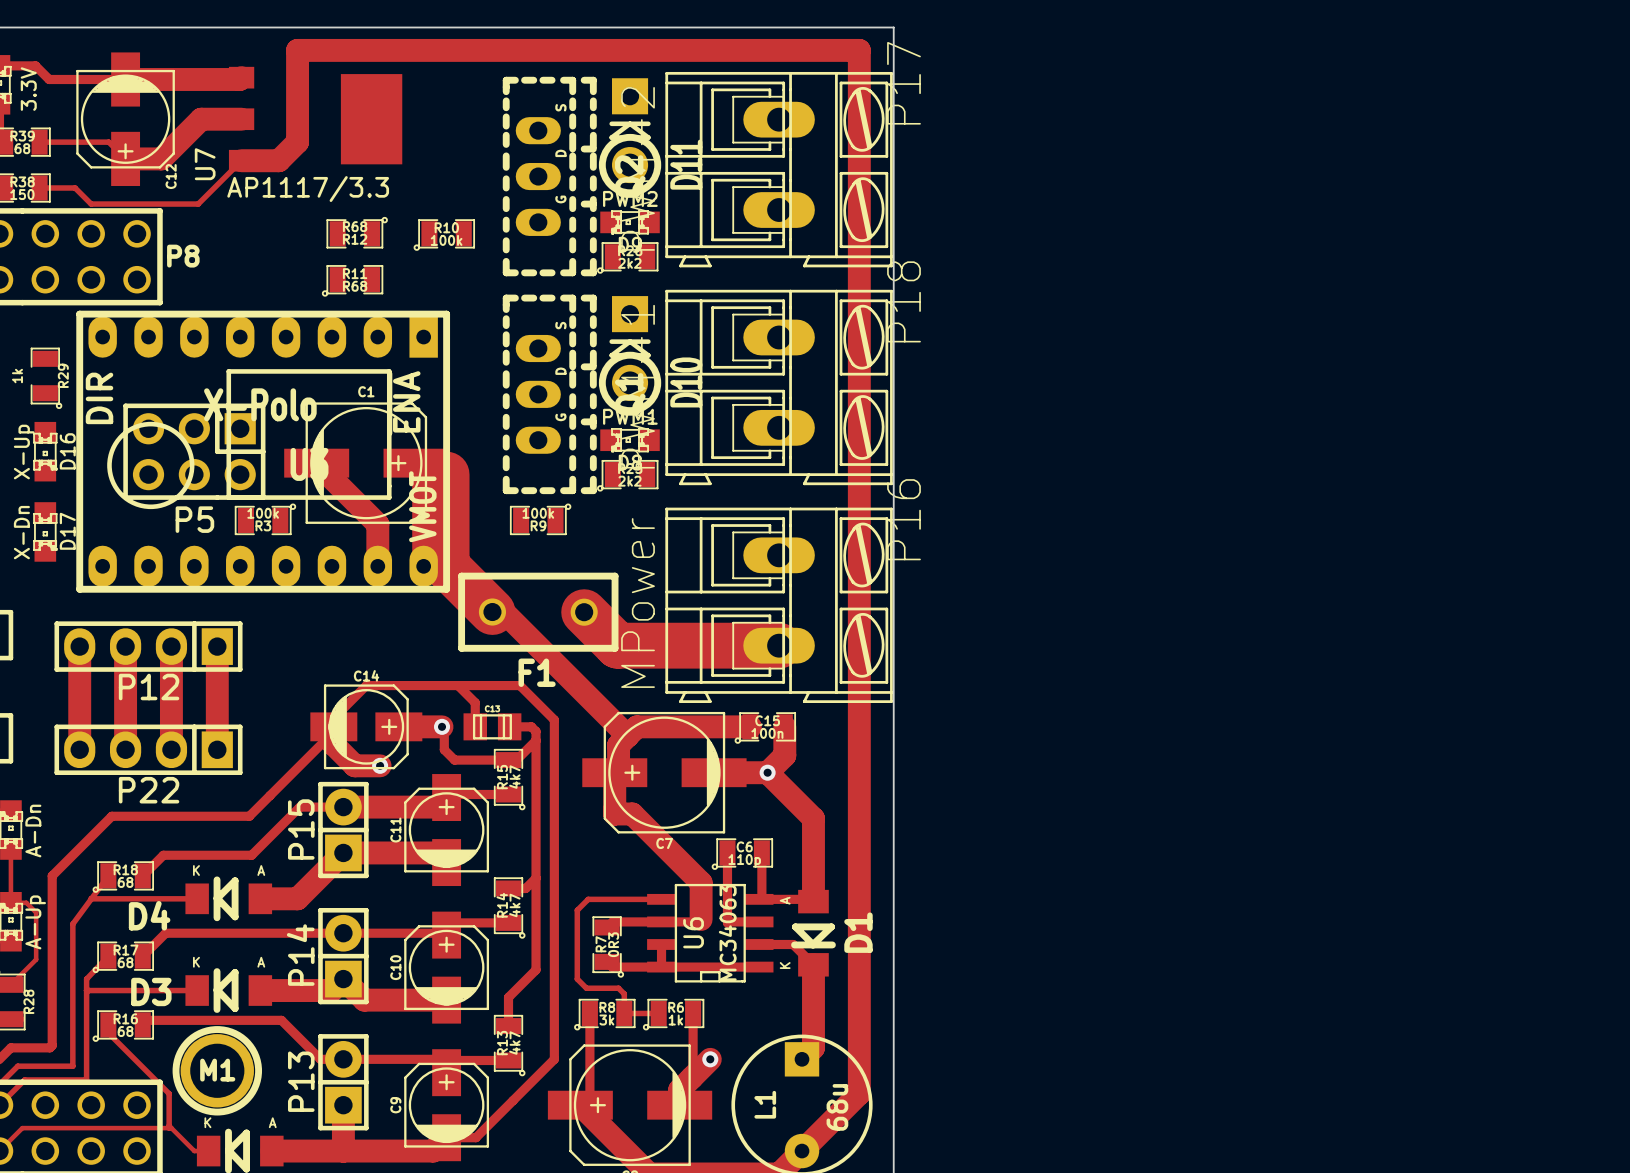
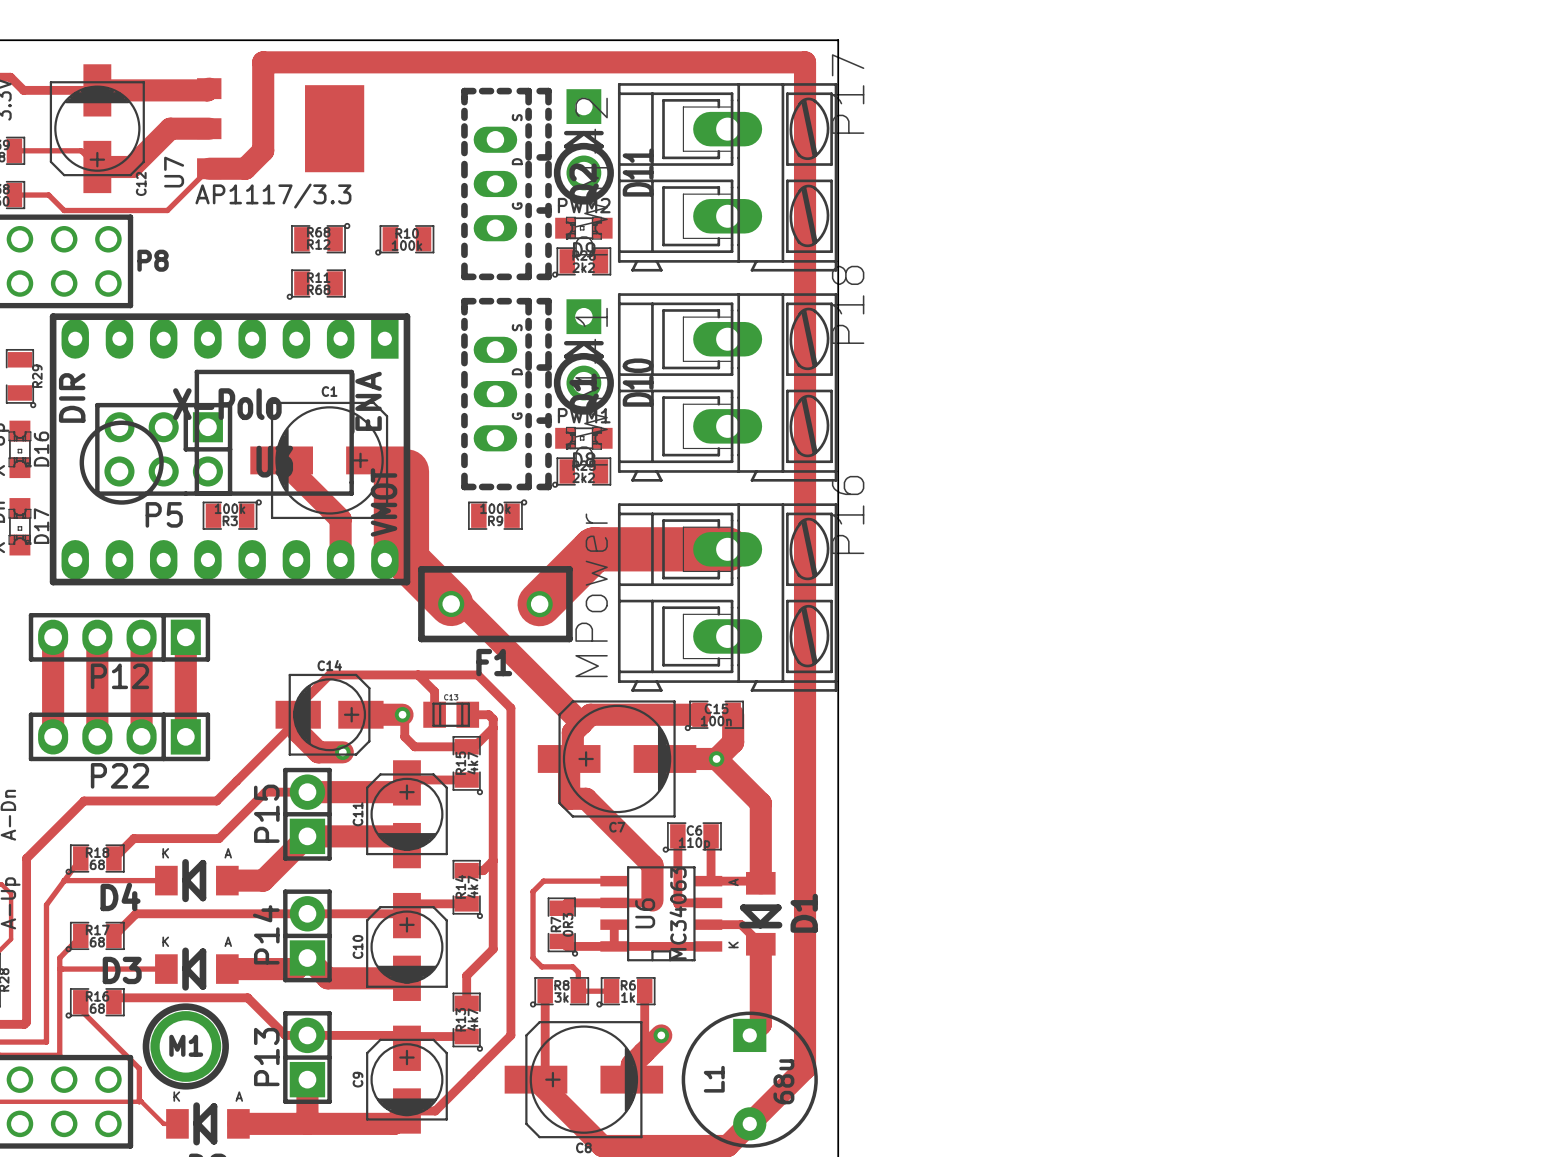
track: (584, 612) (617, 645) (779, 645) -> (539, 604) (594, 549) (727, 549)

